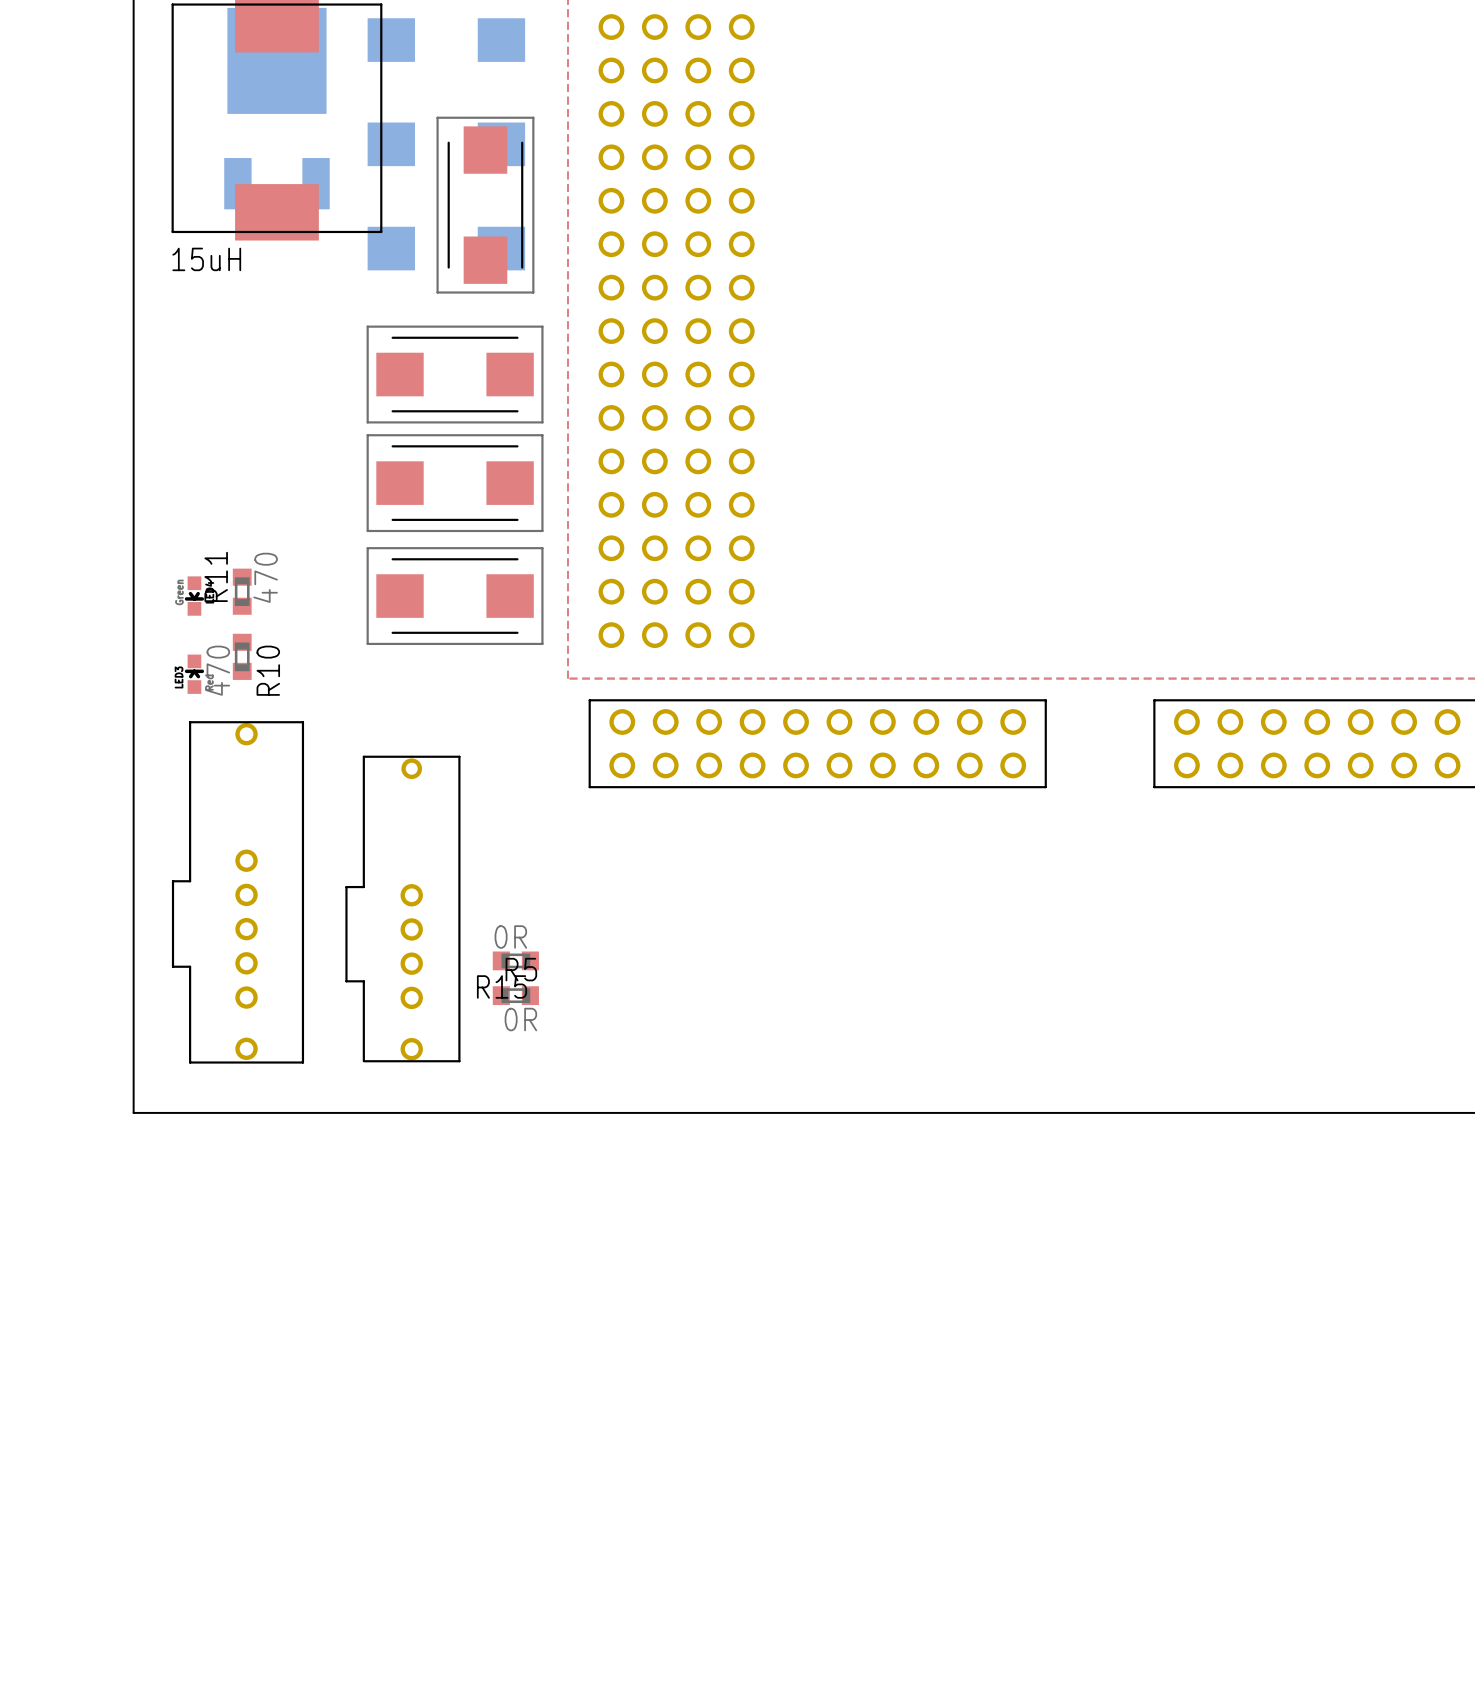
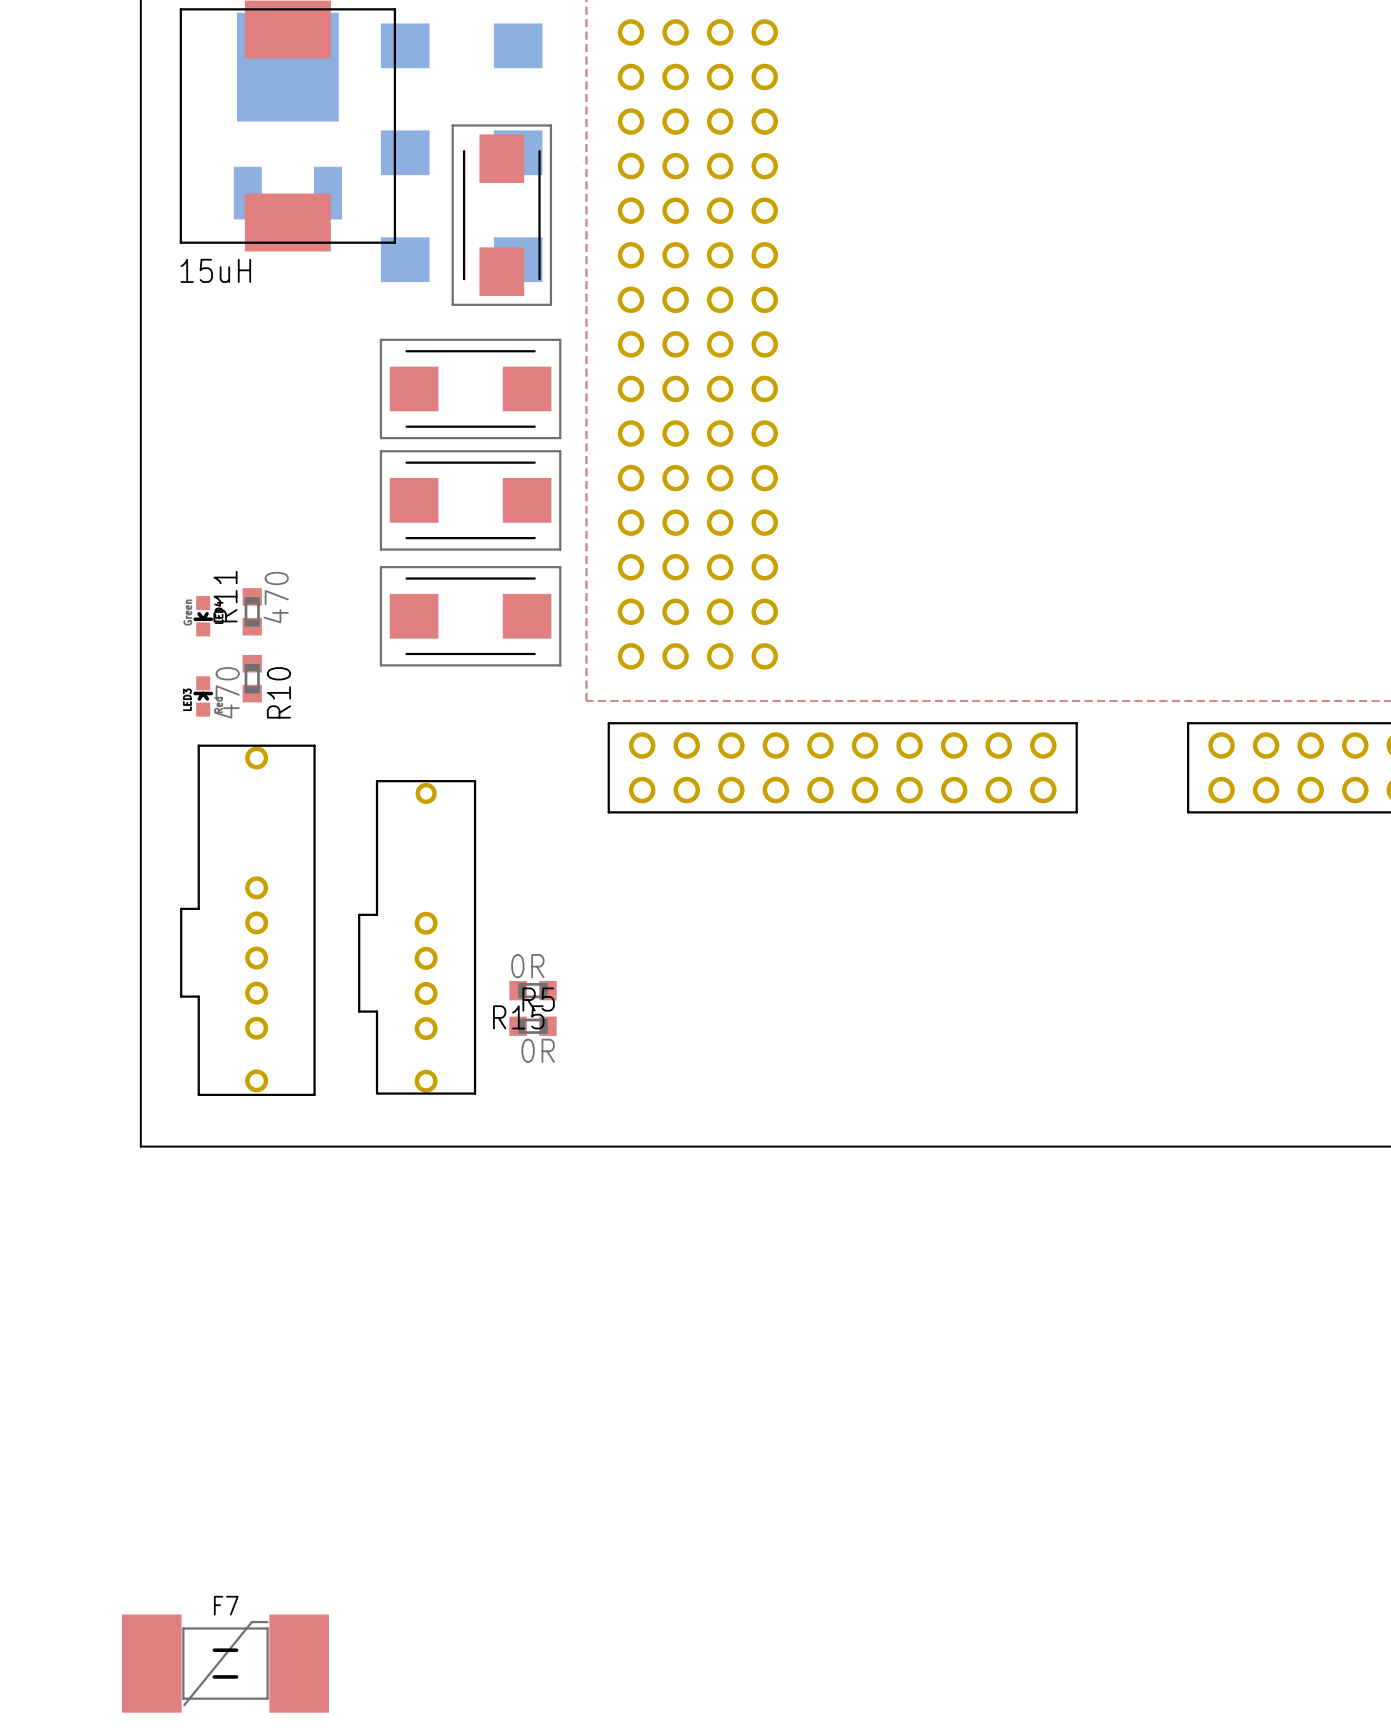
F7: none -> (225, 1663)

